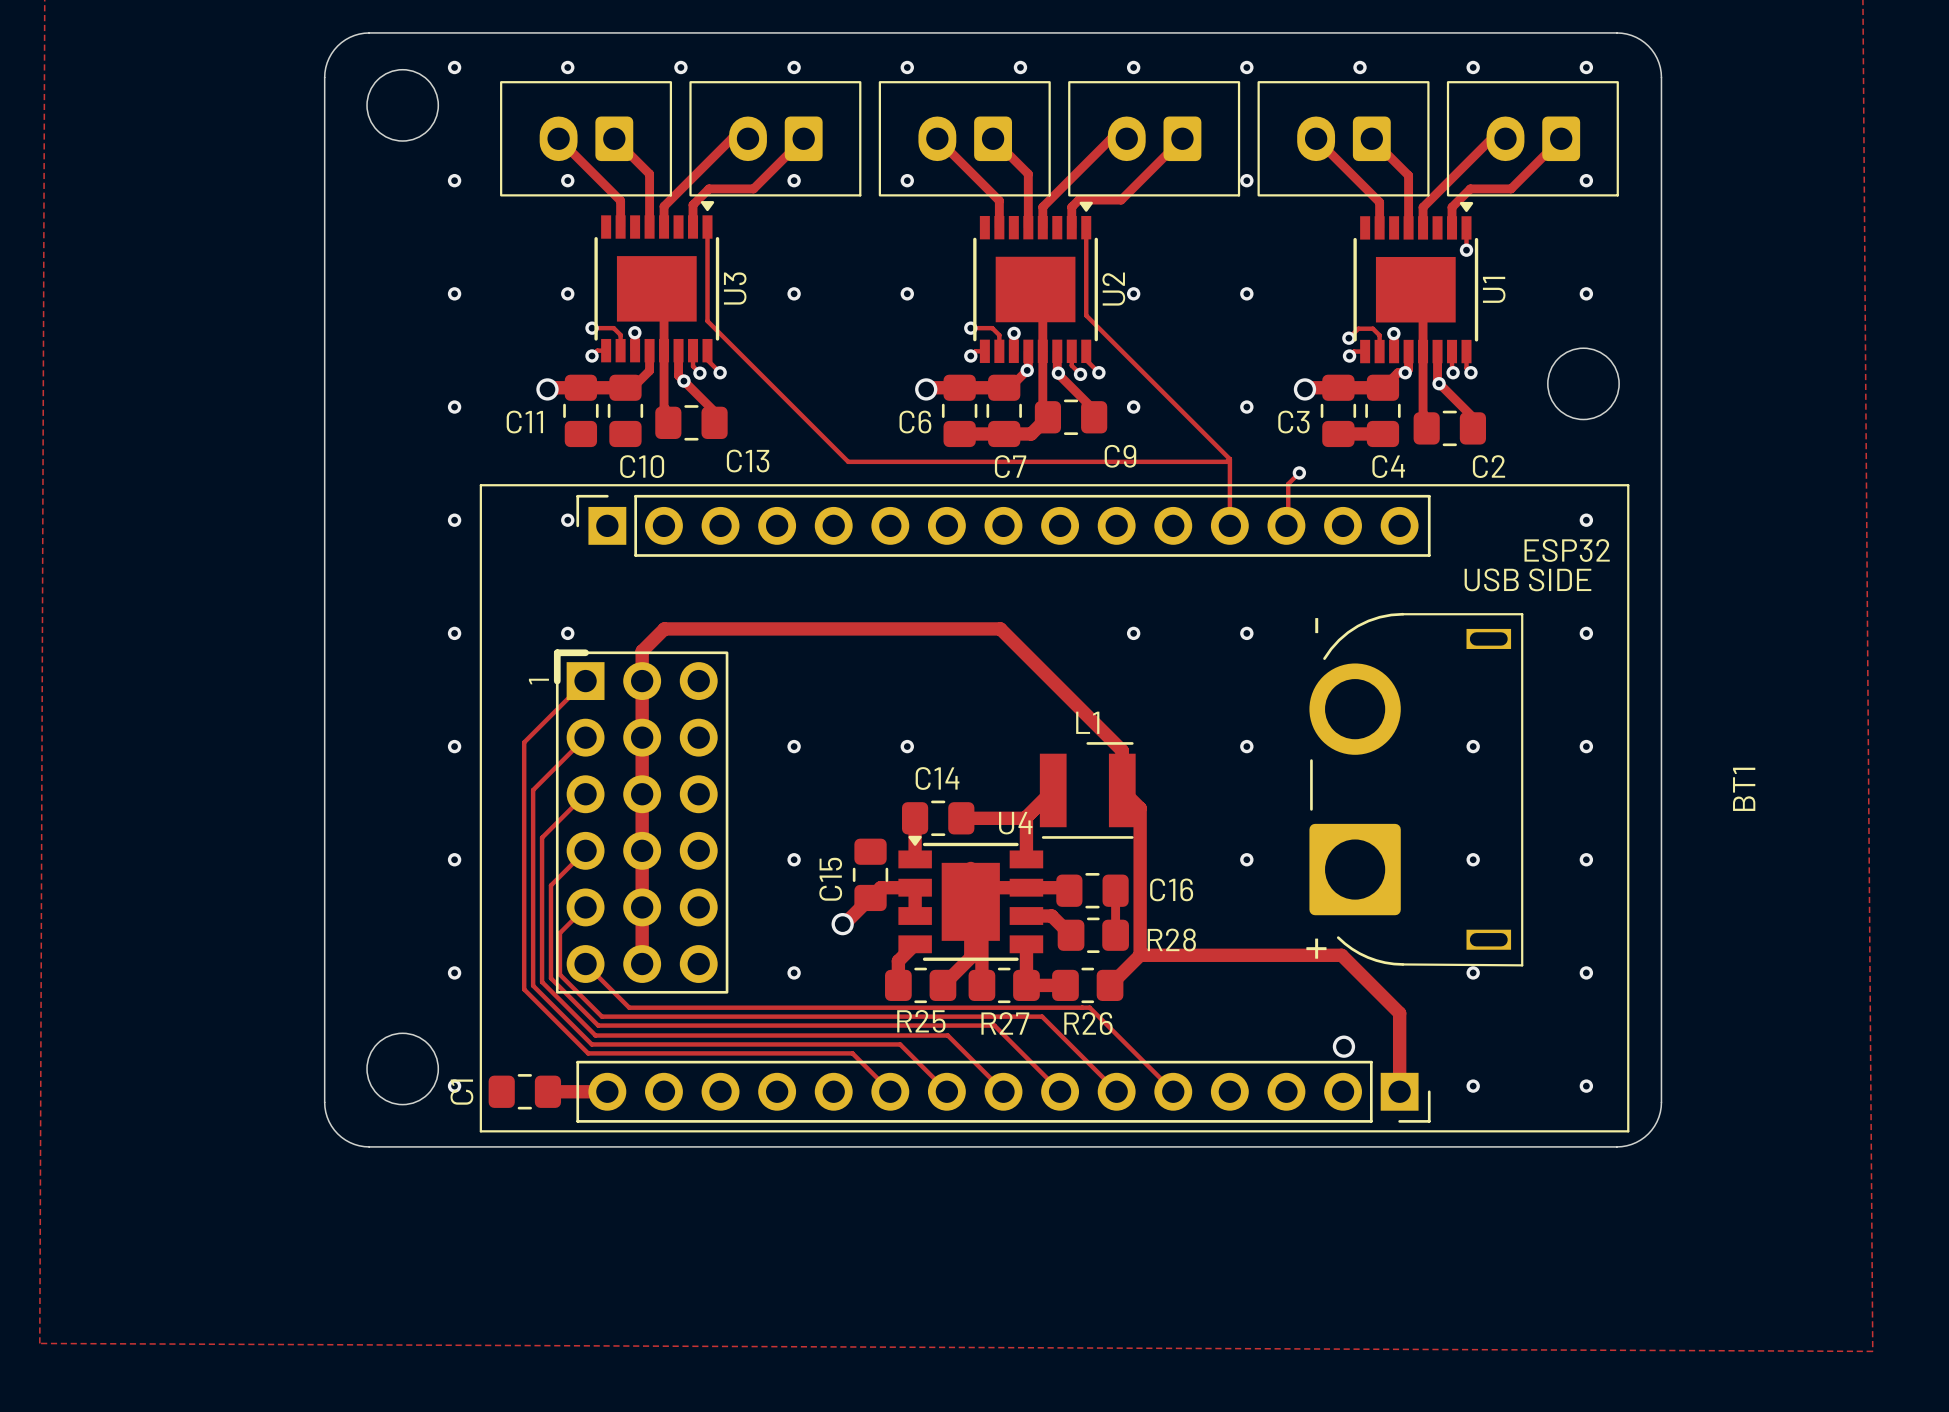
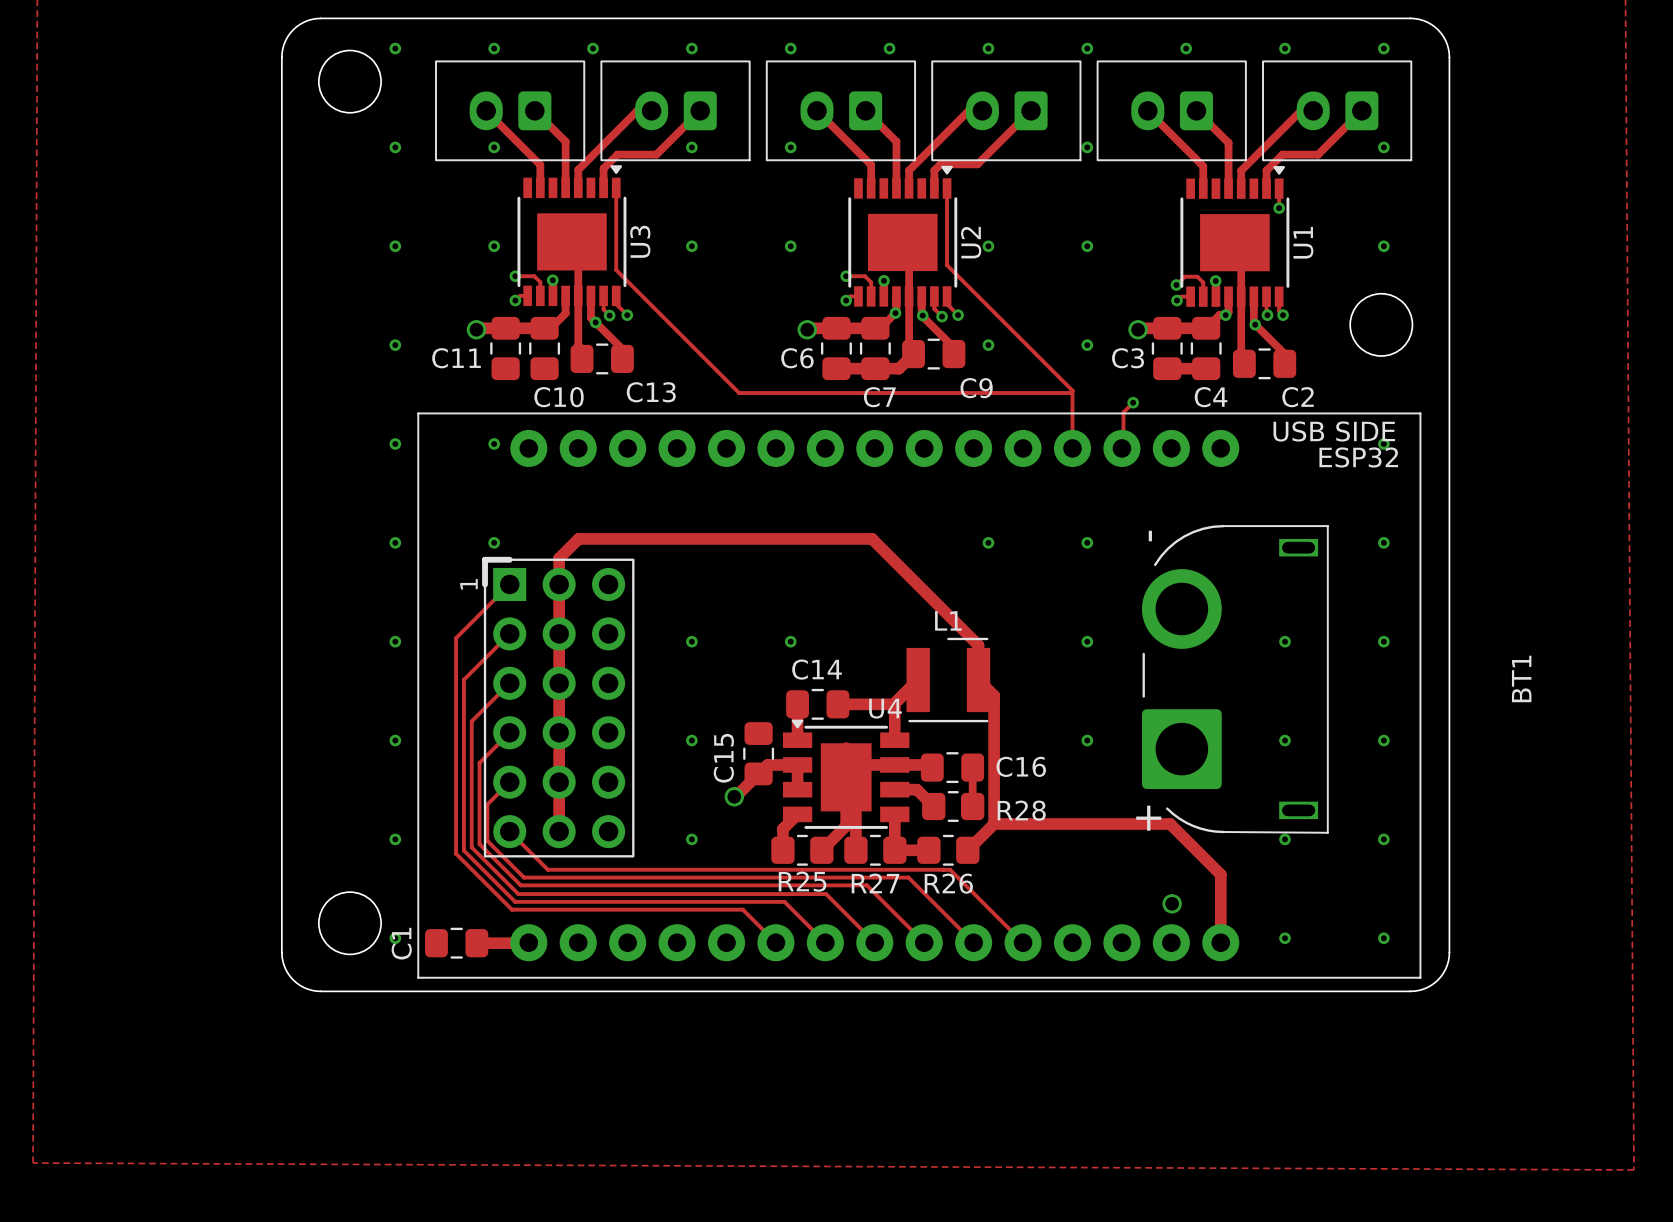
ESP32 footprint: [479, 484, 1630, 1133] -> [417, 412, 1422, 979]
part: (1003, 525) -> none
part: (1003, 1091) -> none

